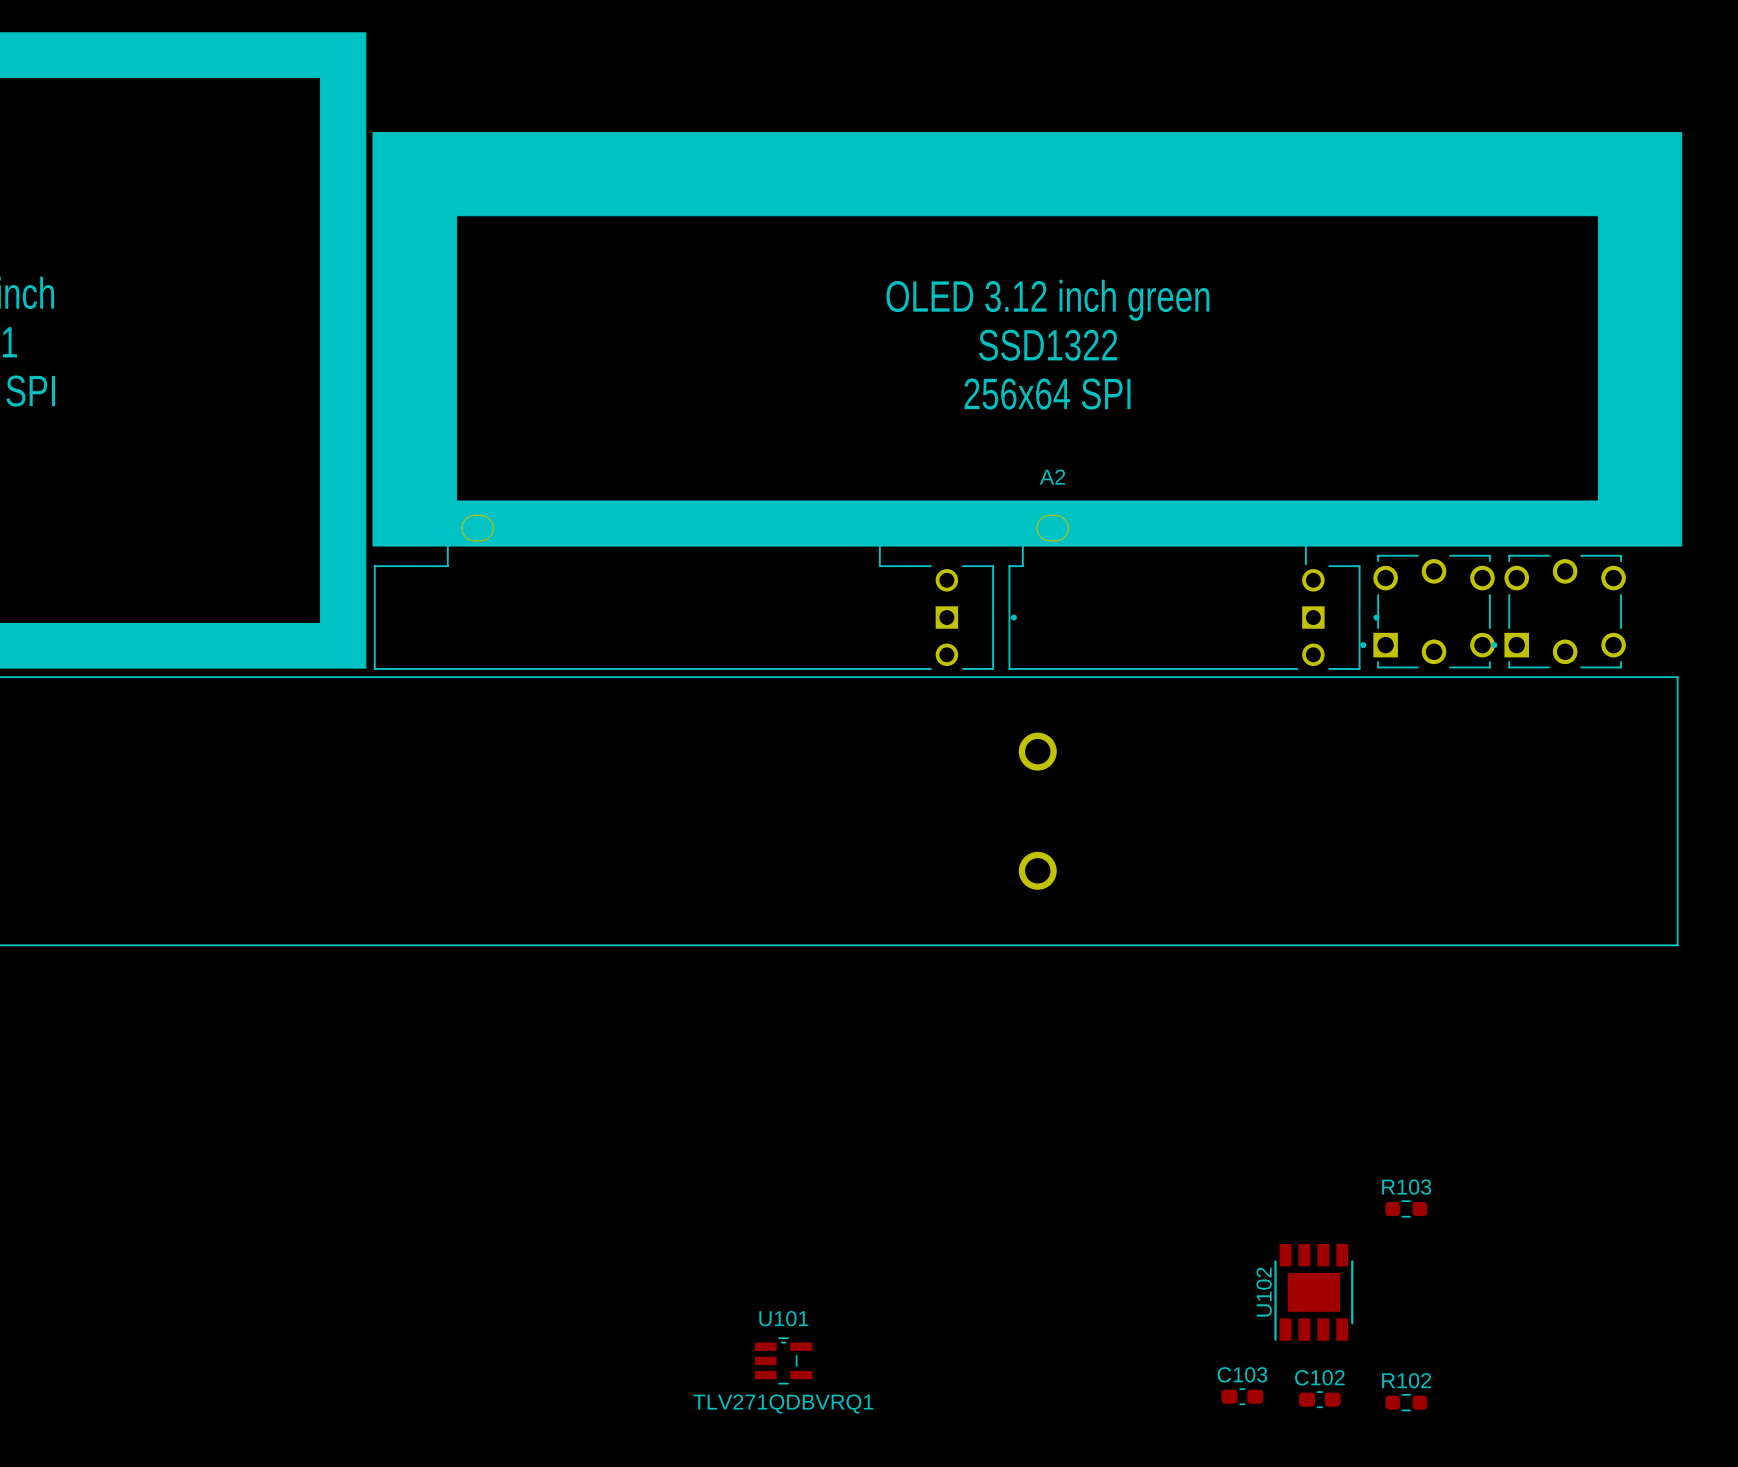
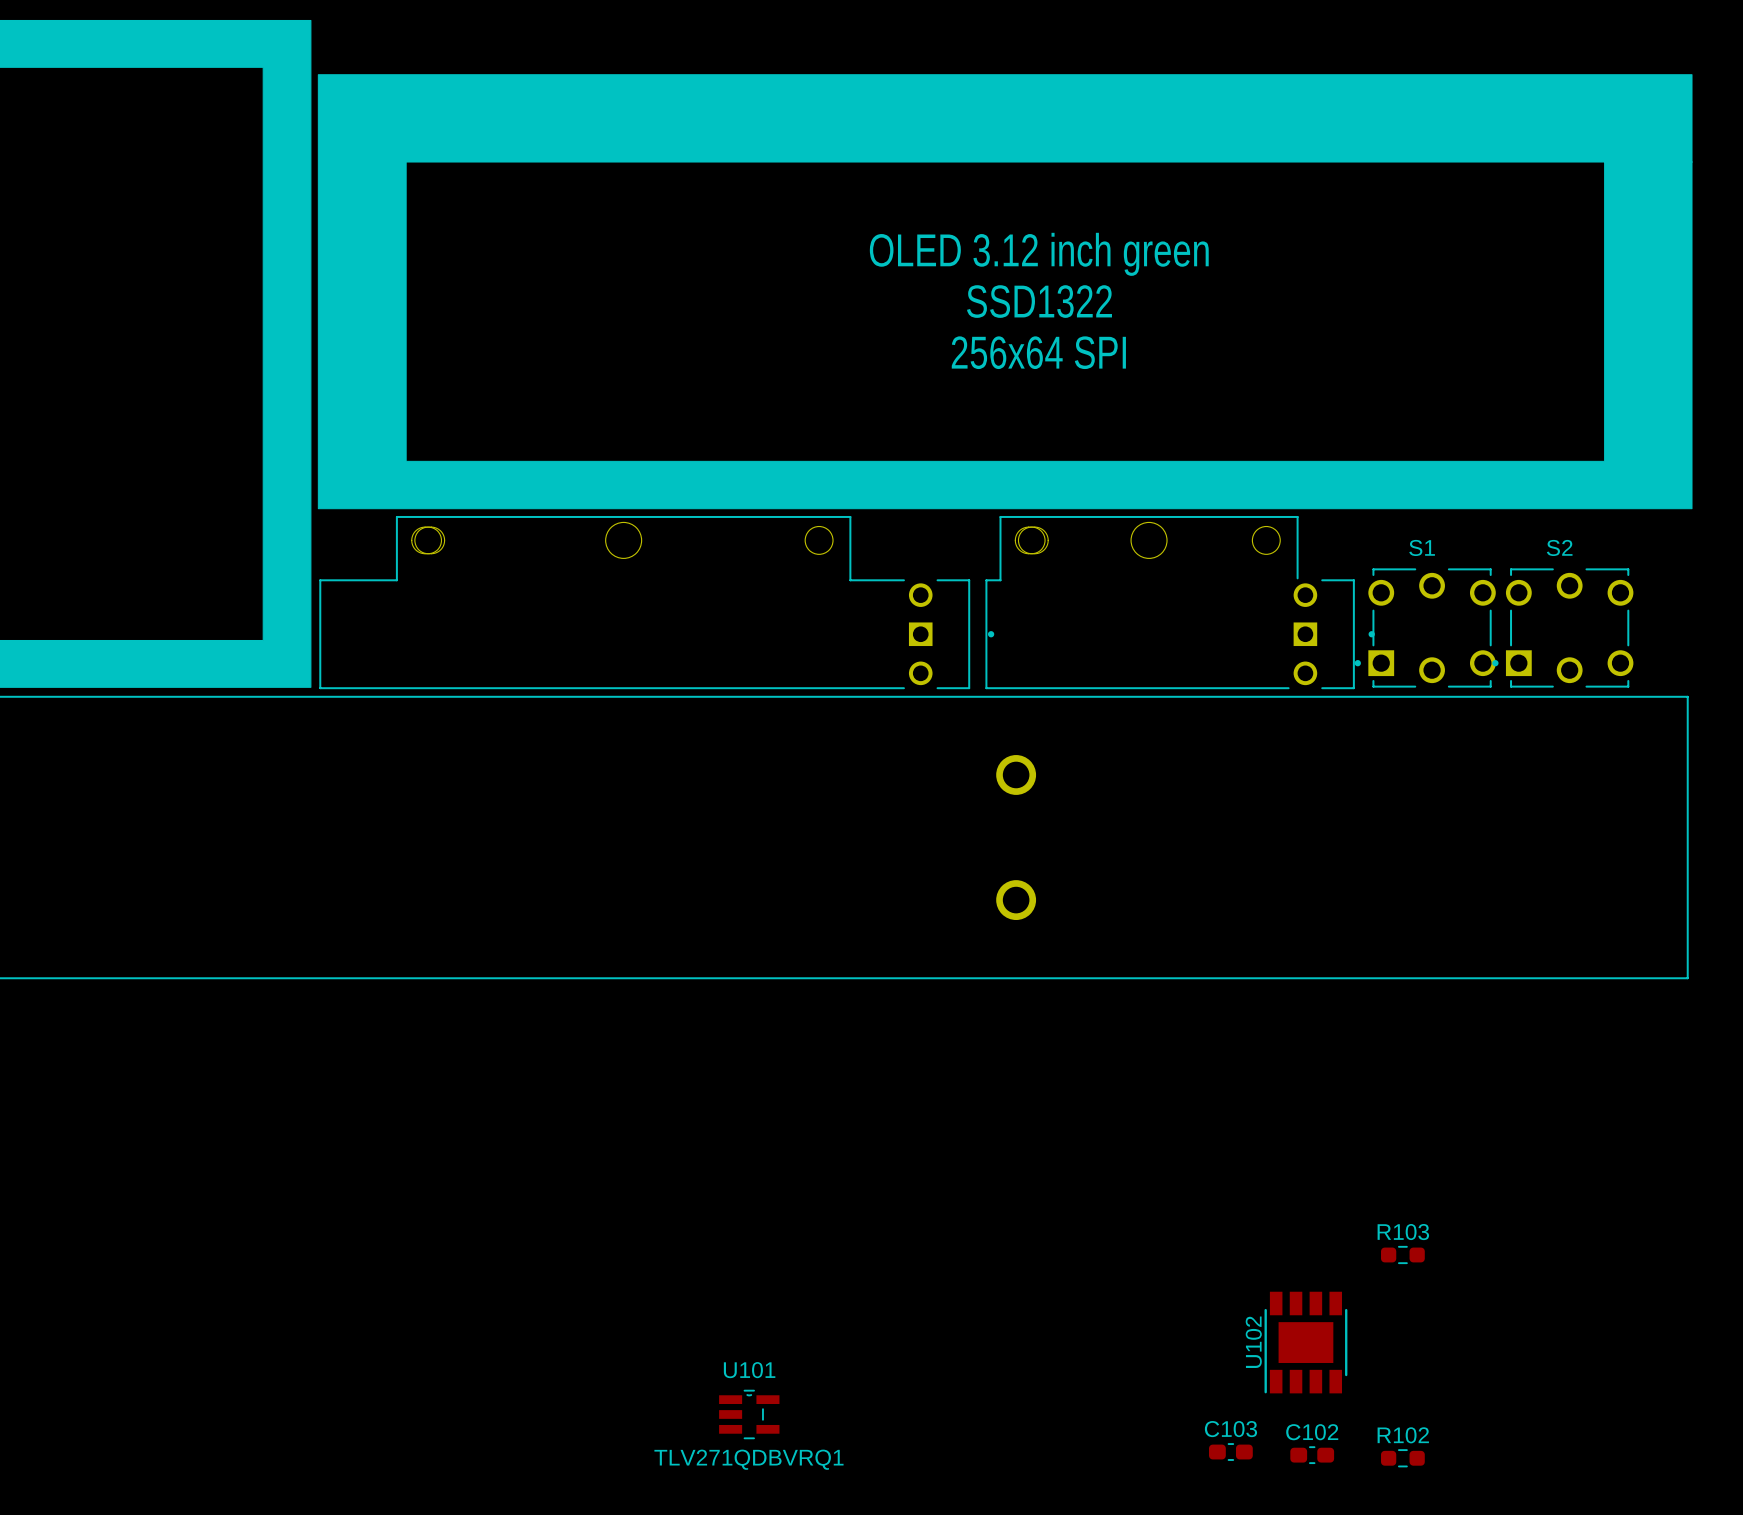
text position: OLED 3.12 inch green (1047, 300) -> OLED 3.12 inch green (1039, 254)
drawing position: (1027, 339) -> (1005, 291)
text position: SSD1322 (1048, 345) -> SSD1322 (1039, 301)
text position: 256x64 SPI (1047, 394) -> 256x64 SPI (1038, 352)

